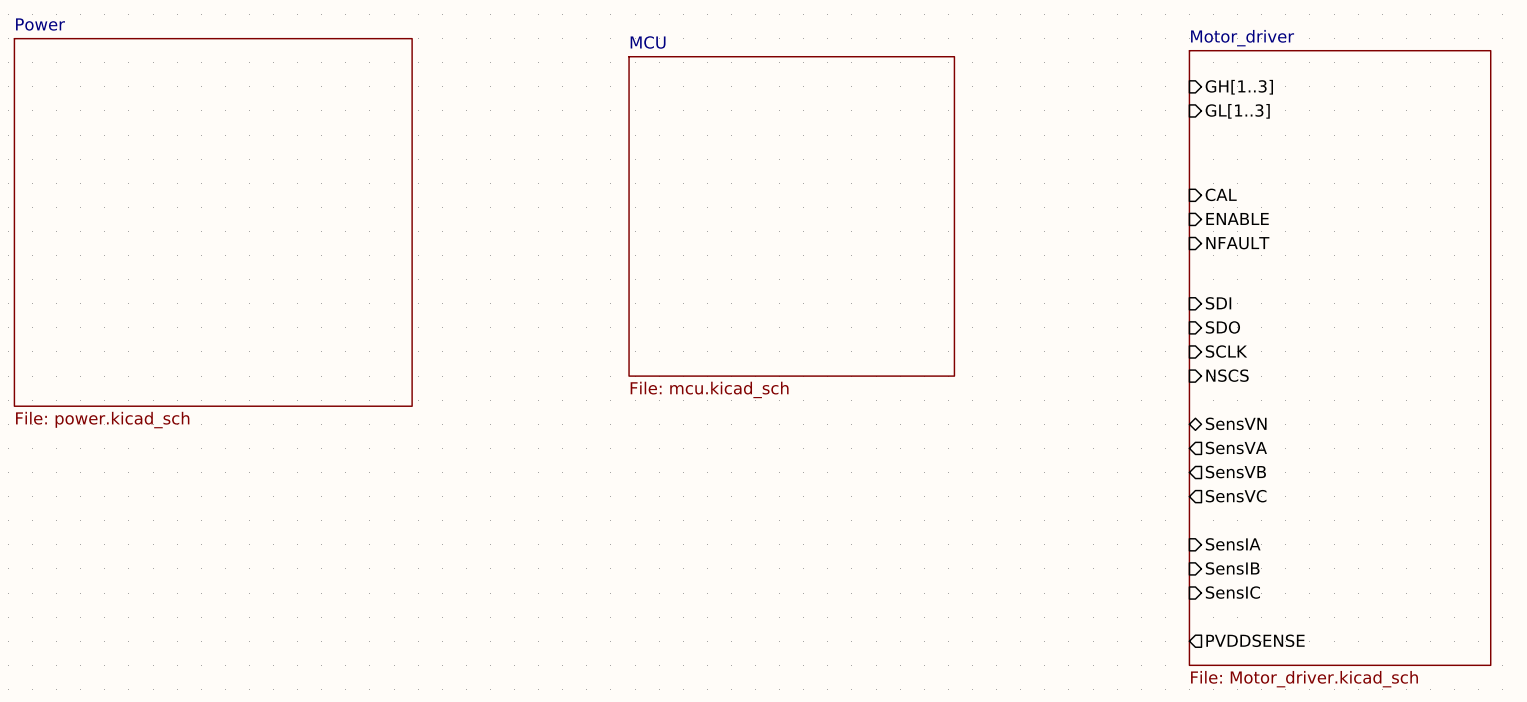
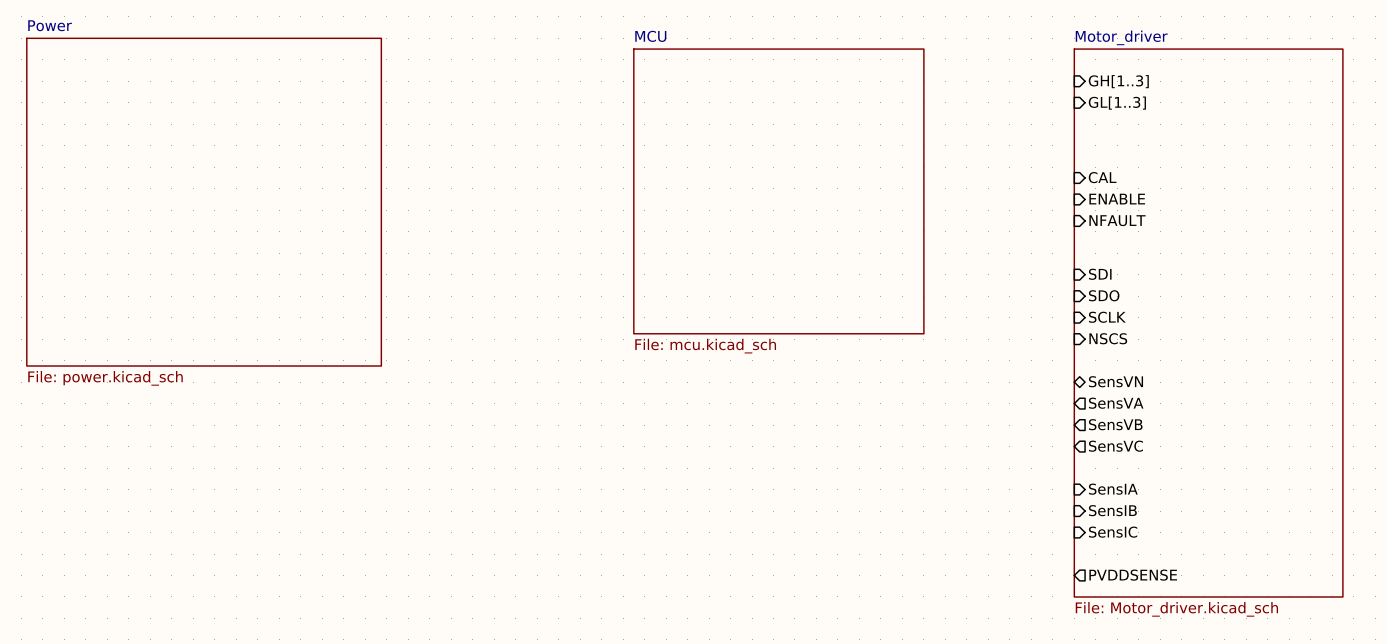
sheet MCU position: (791, 216) -> (778, 191)

